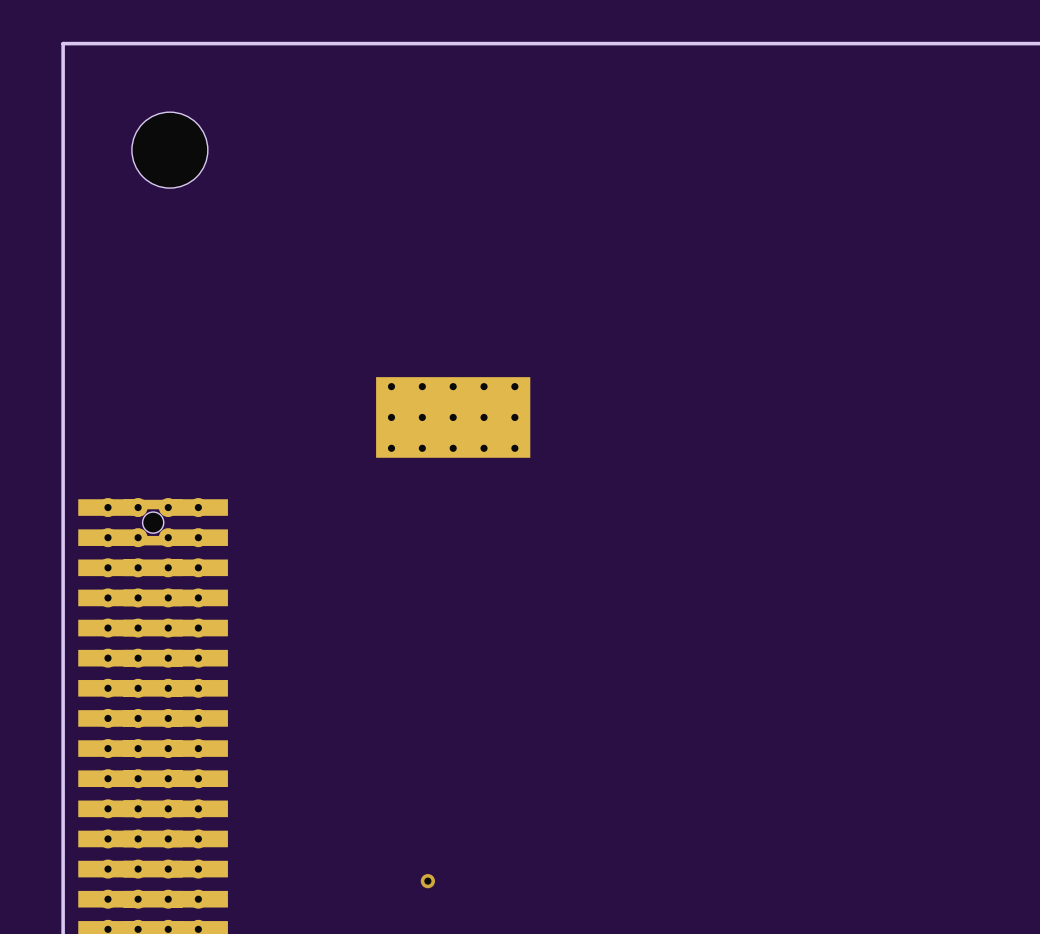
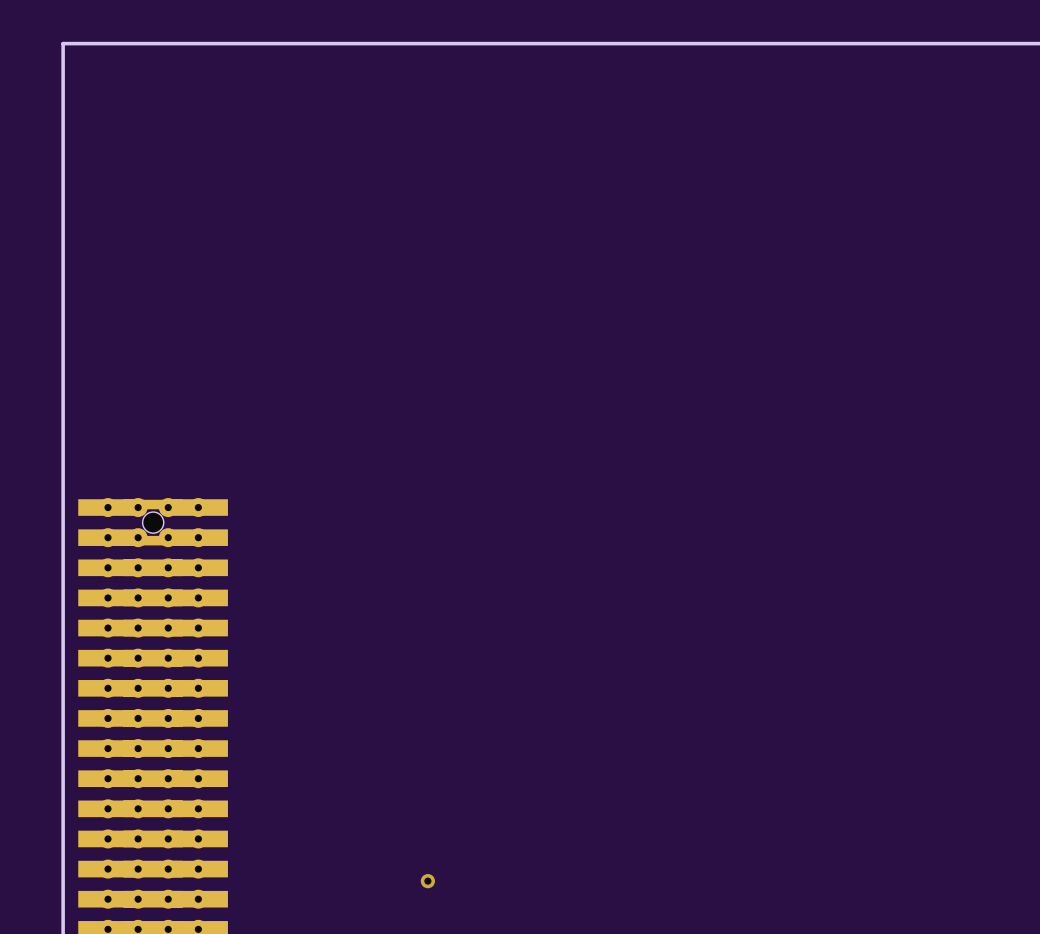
part: (169, 150) -> none
part: (453, 417) -> none

